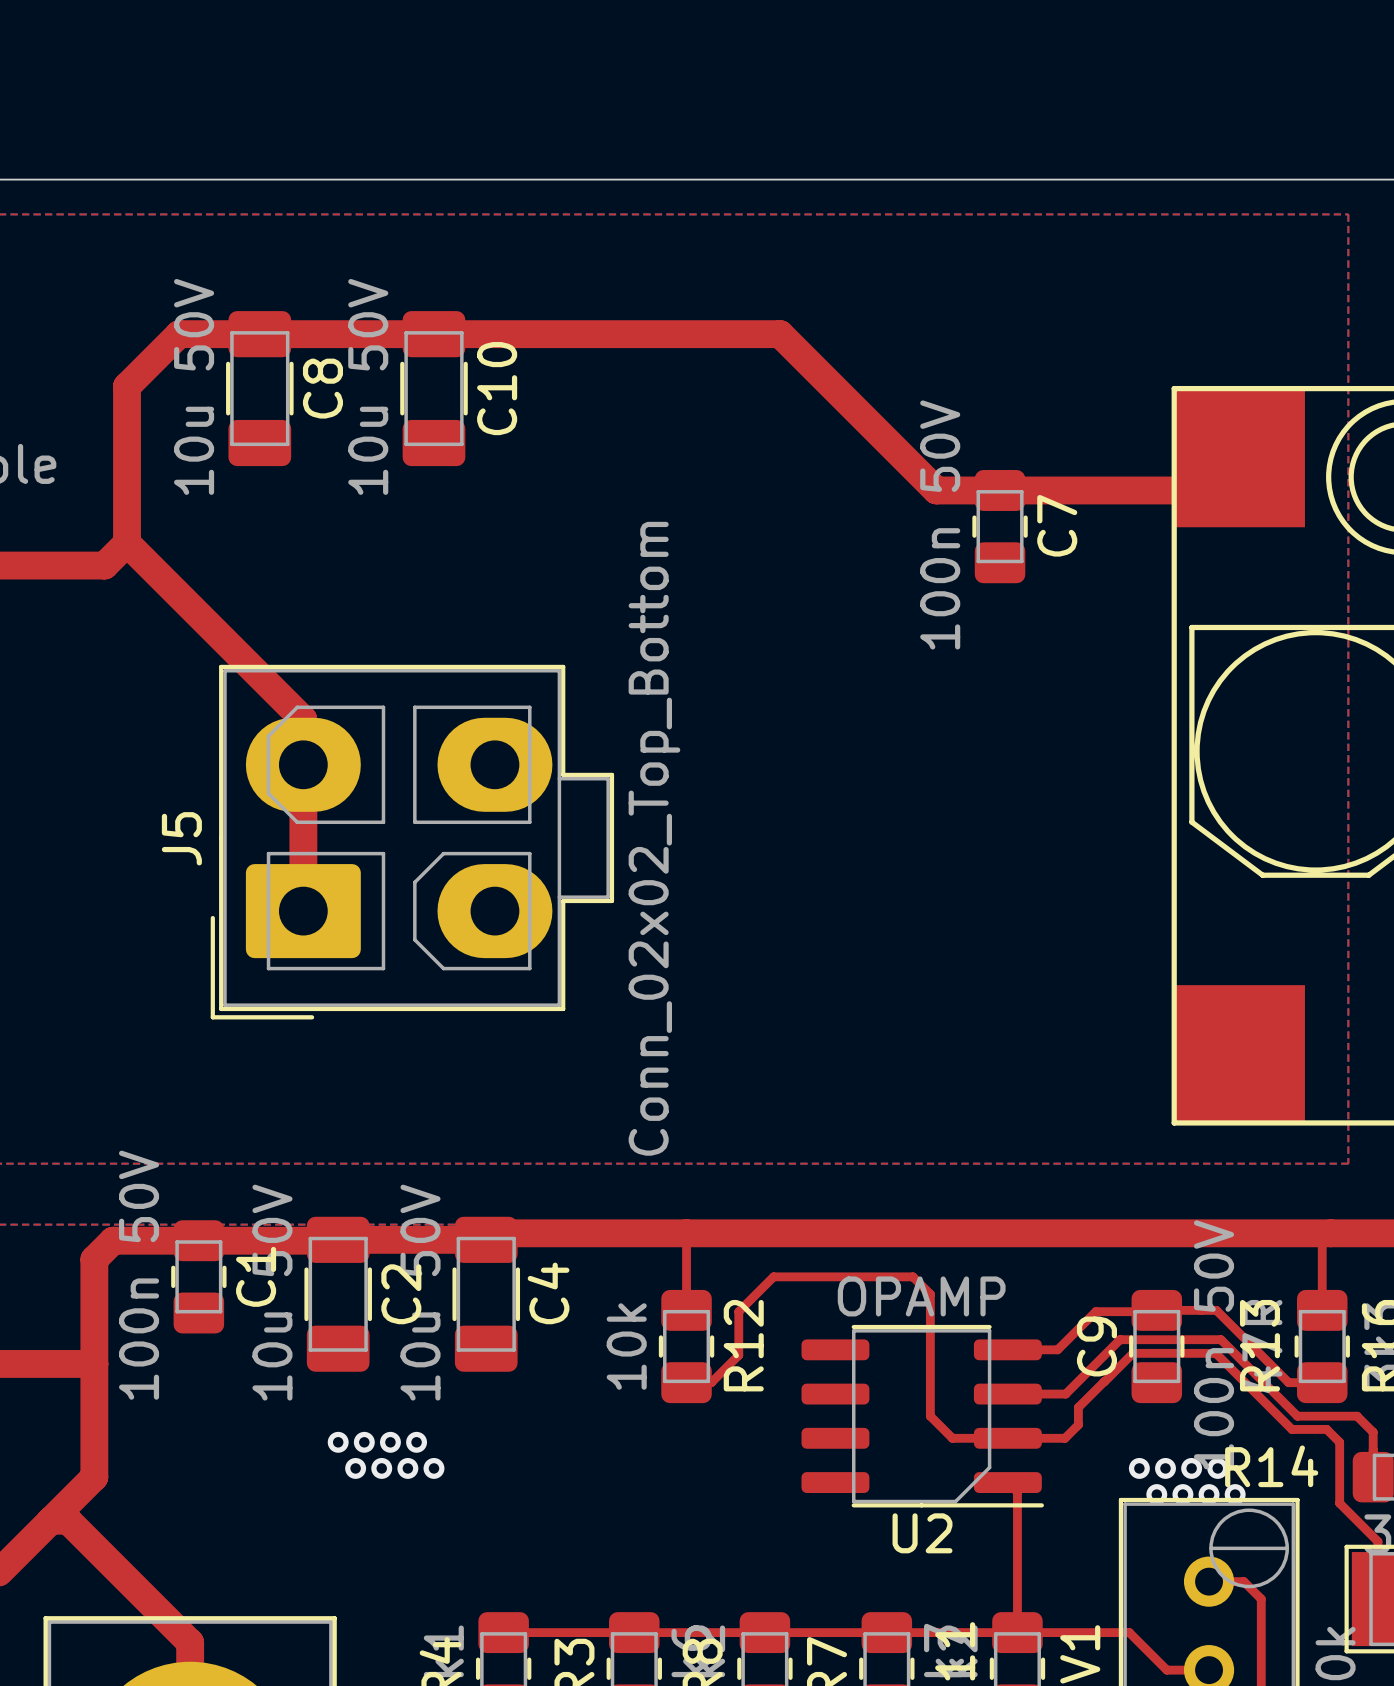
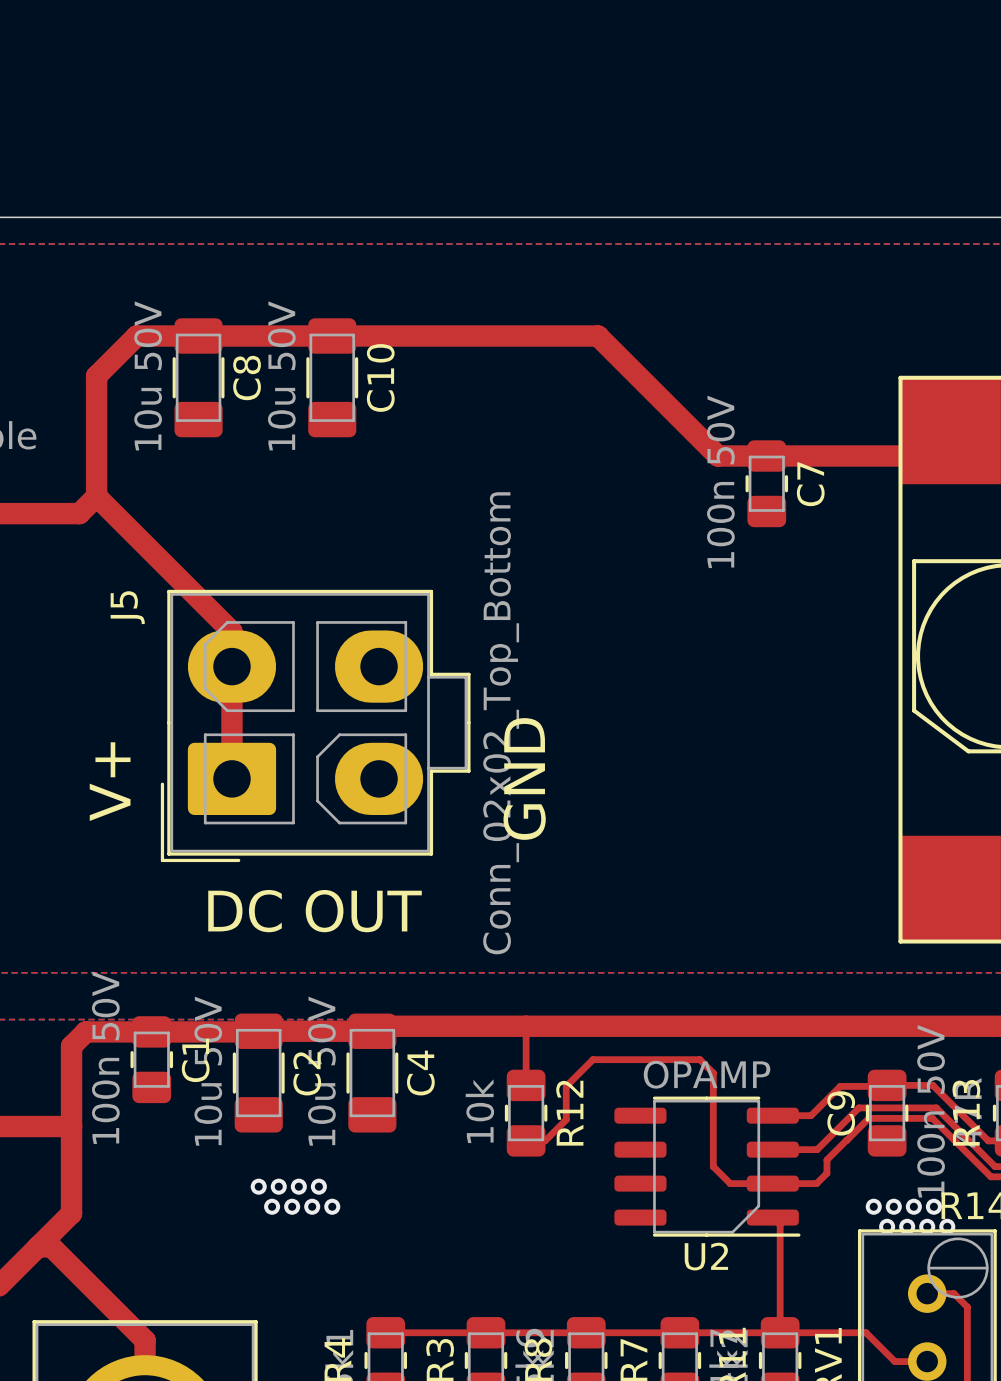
J5 name position: J5 (181, 838) -> J5 (127, 607)
text: none -> GND (524, 778)
text: none -> V+ (110, 781)
text: none -> DC OUT (315, 911)

